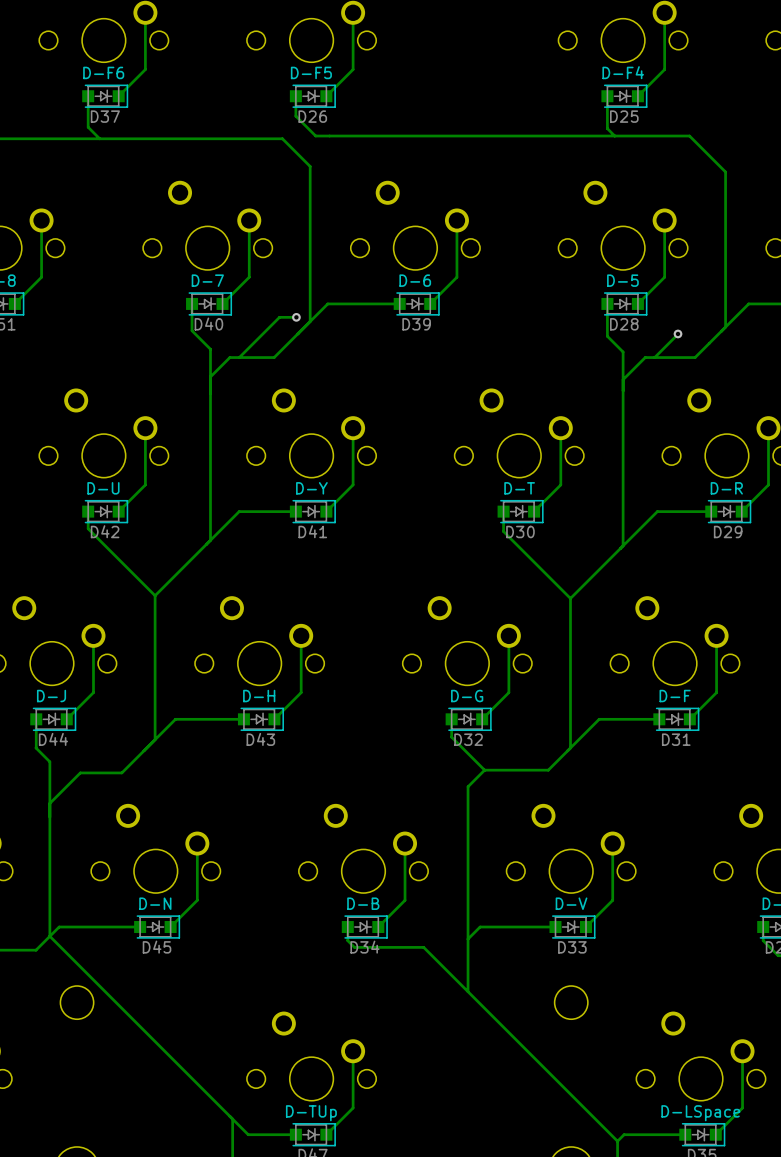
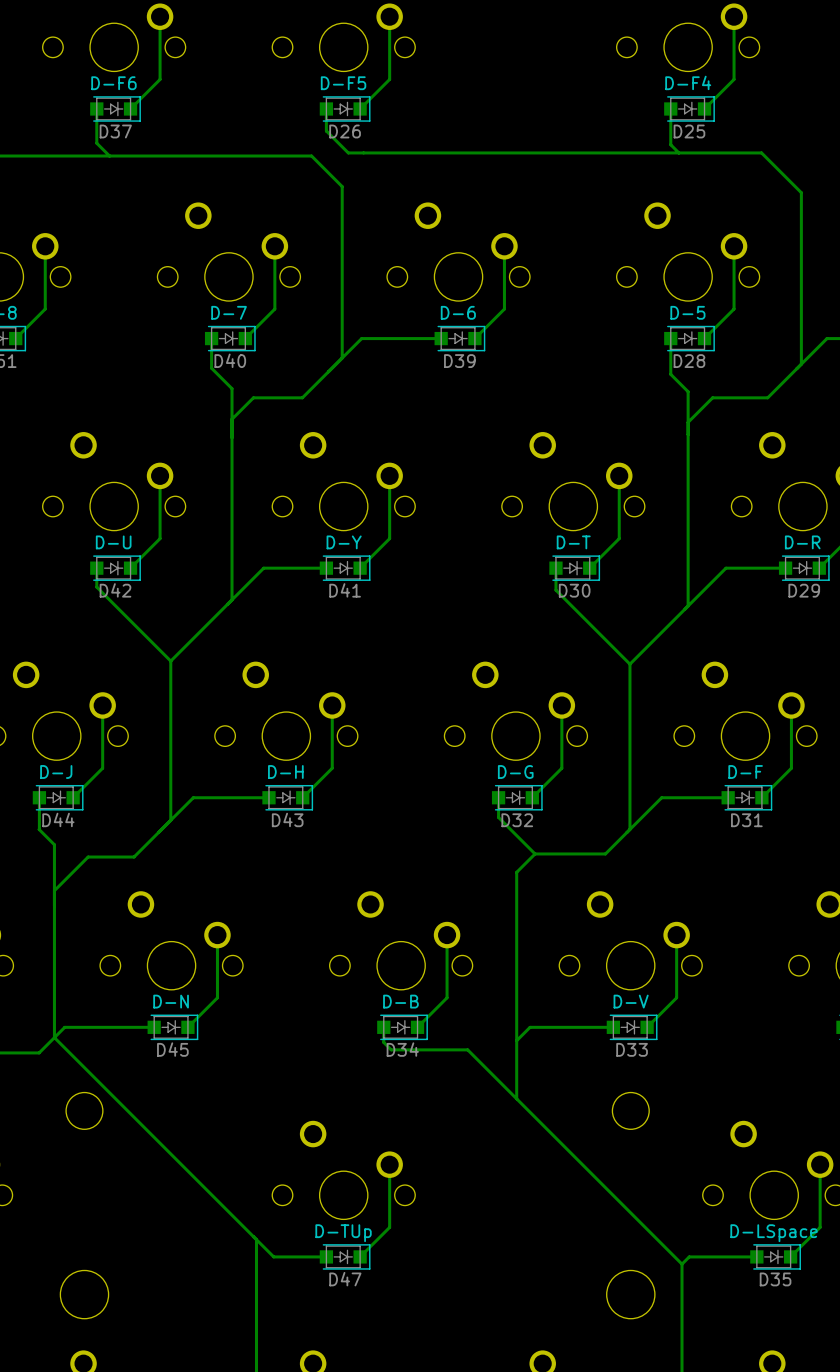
track: (296, 317) (279, 317) (239, 357) -> none
via: (296, 317) -> none
track: (678, 333) (654, 357) -> none
via: (678, 333) -> none

